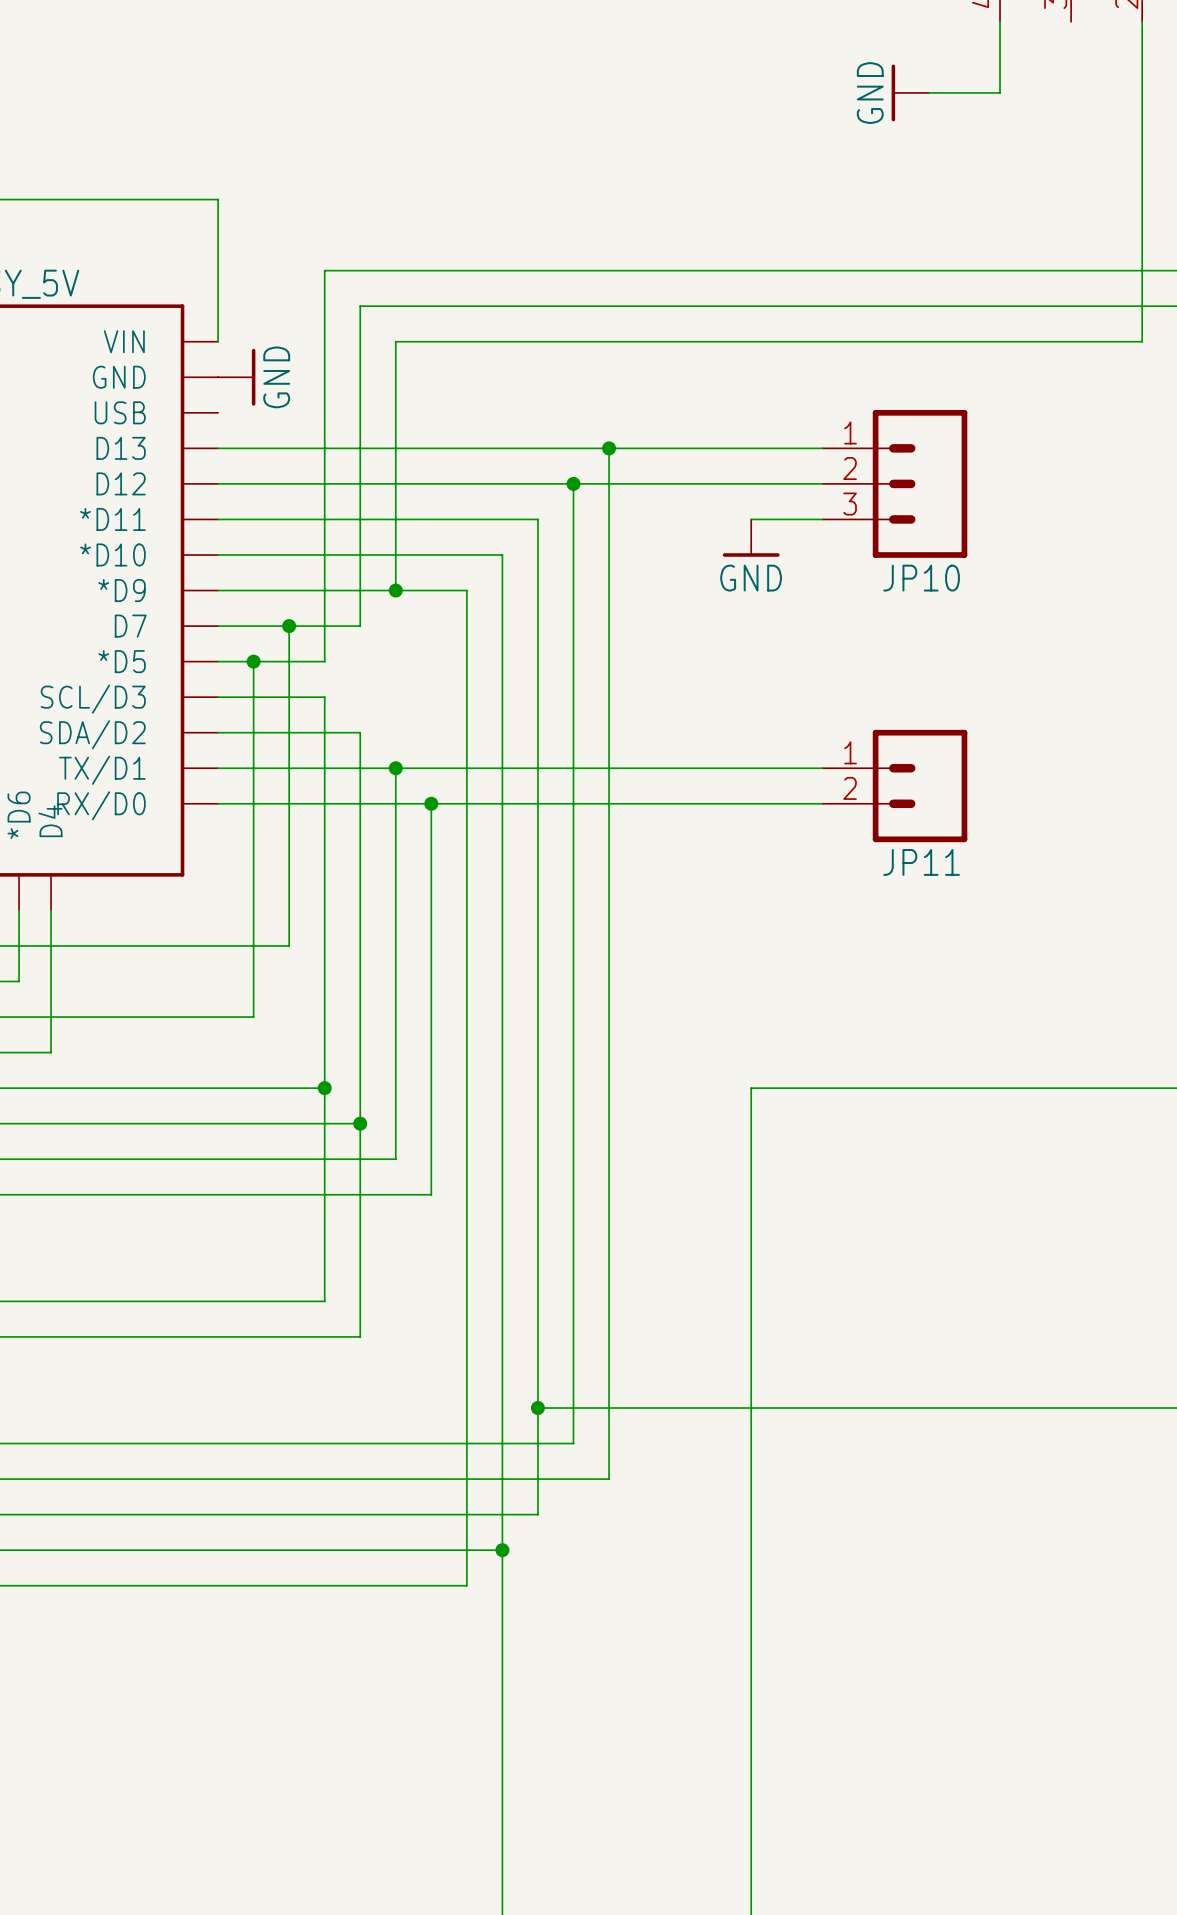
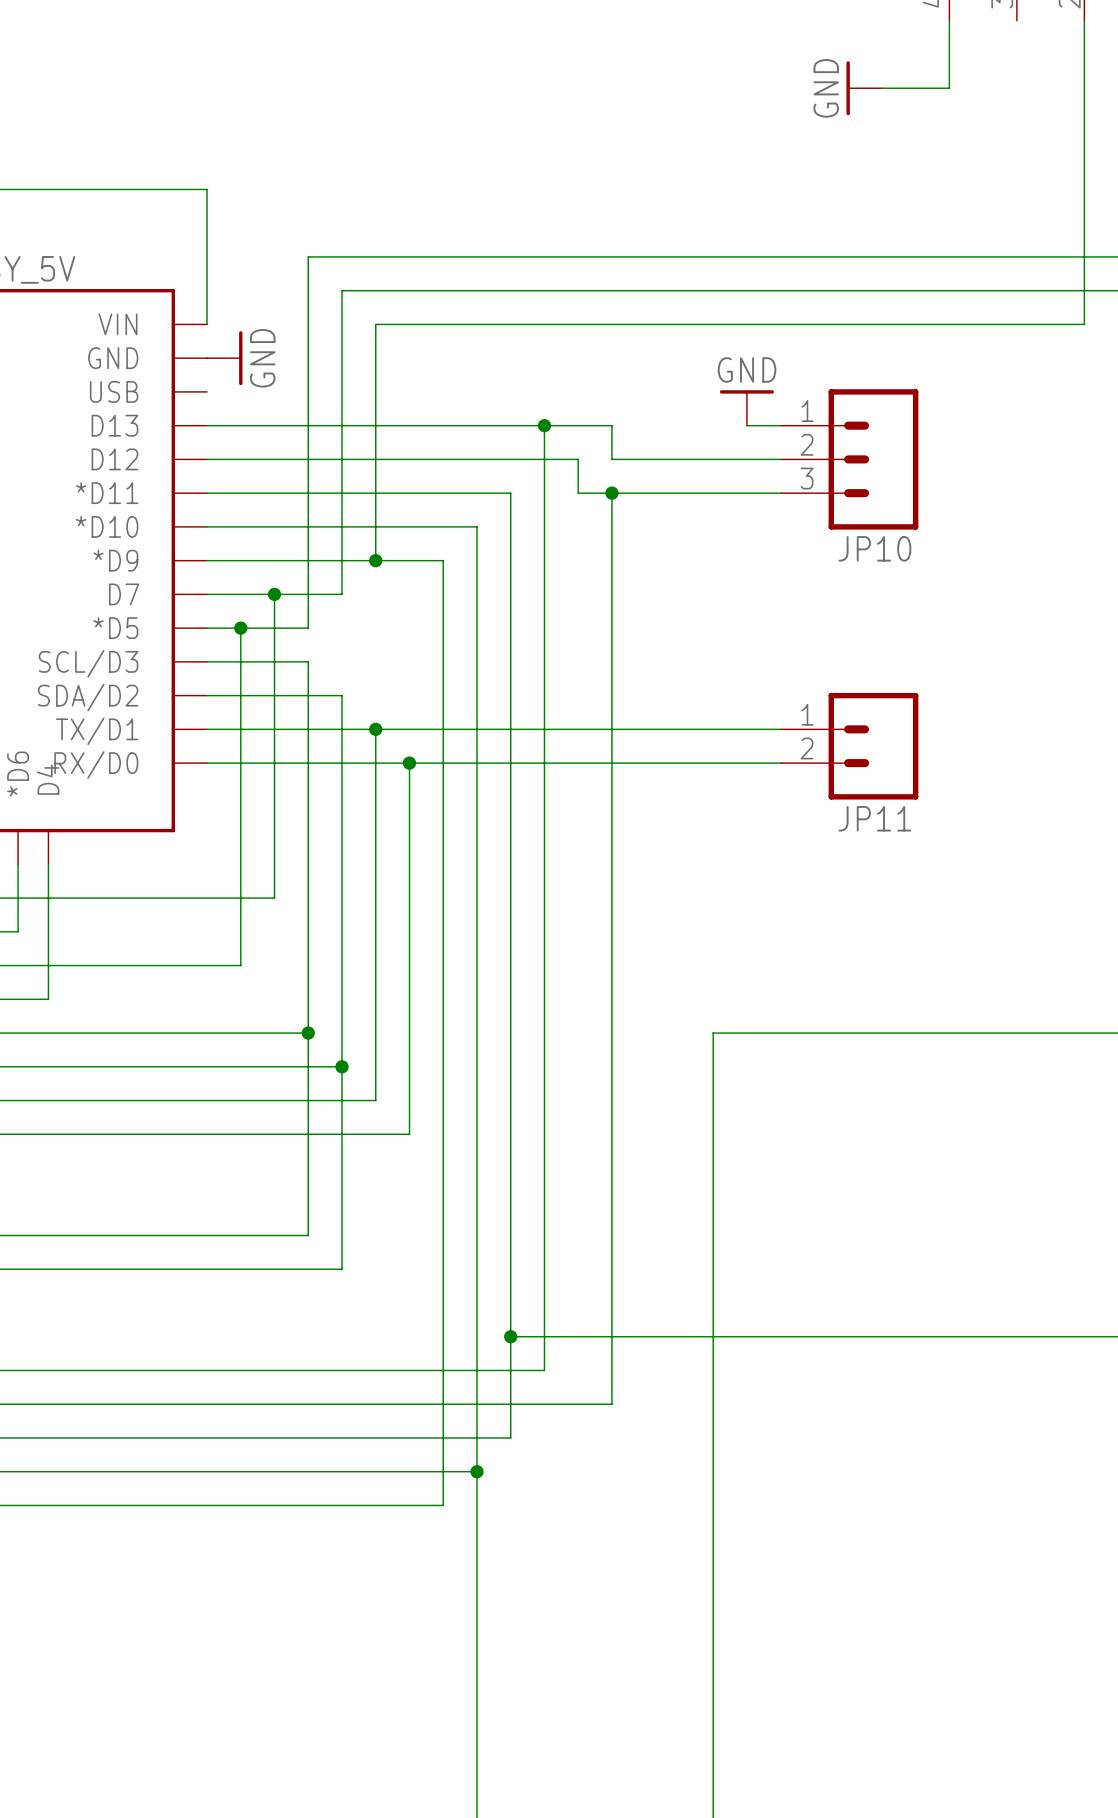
wire: none -> (544, 425) (544, 459)
junction: none -> (544, 425)
wire: (609, 448) (609, 483) (644, 483) -> (611, 425) (611, 459)
junction: (609, 448) -> none
wire: (644, 448) (786, 448) -> (578, 493) (713, 493)
junction: (573, 483) -> none
wire: (609, 519) (609, 1479) -> (611, 493) (611, 1404) (578, 1404)
junction: none -> (611, 493)
power symbol position: GND (751, 538) -> GND (746, 407)
power symbol rotation: 0° (751, 554) -> 180° (746, 391)

